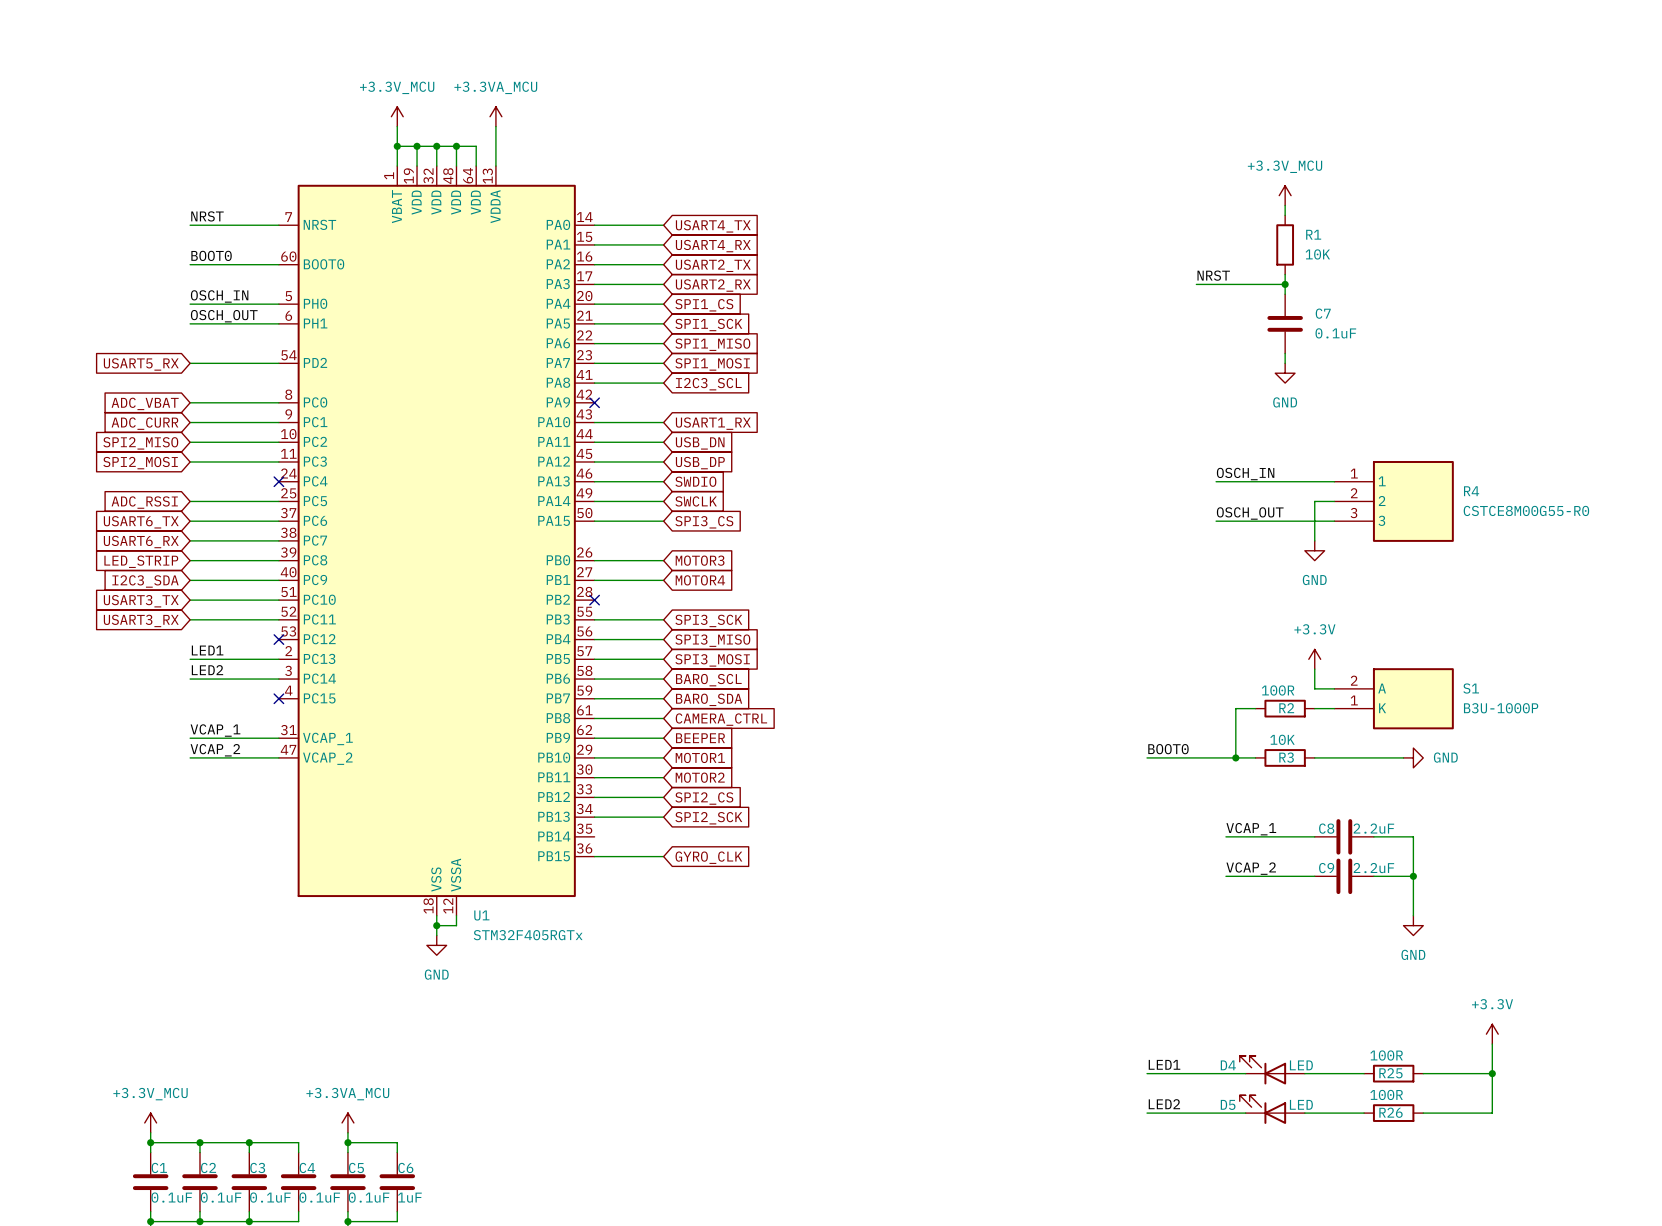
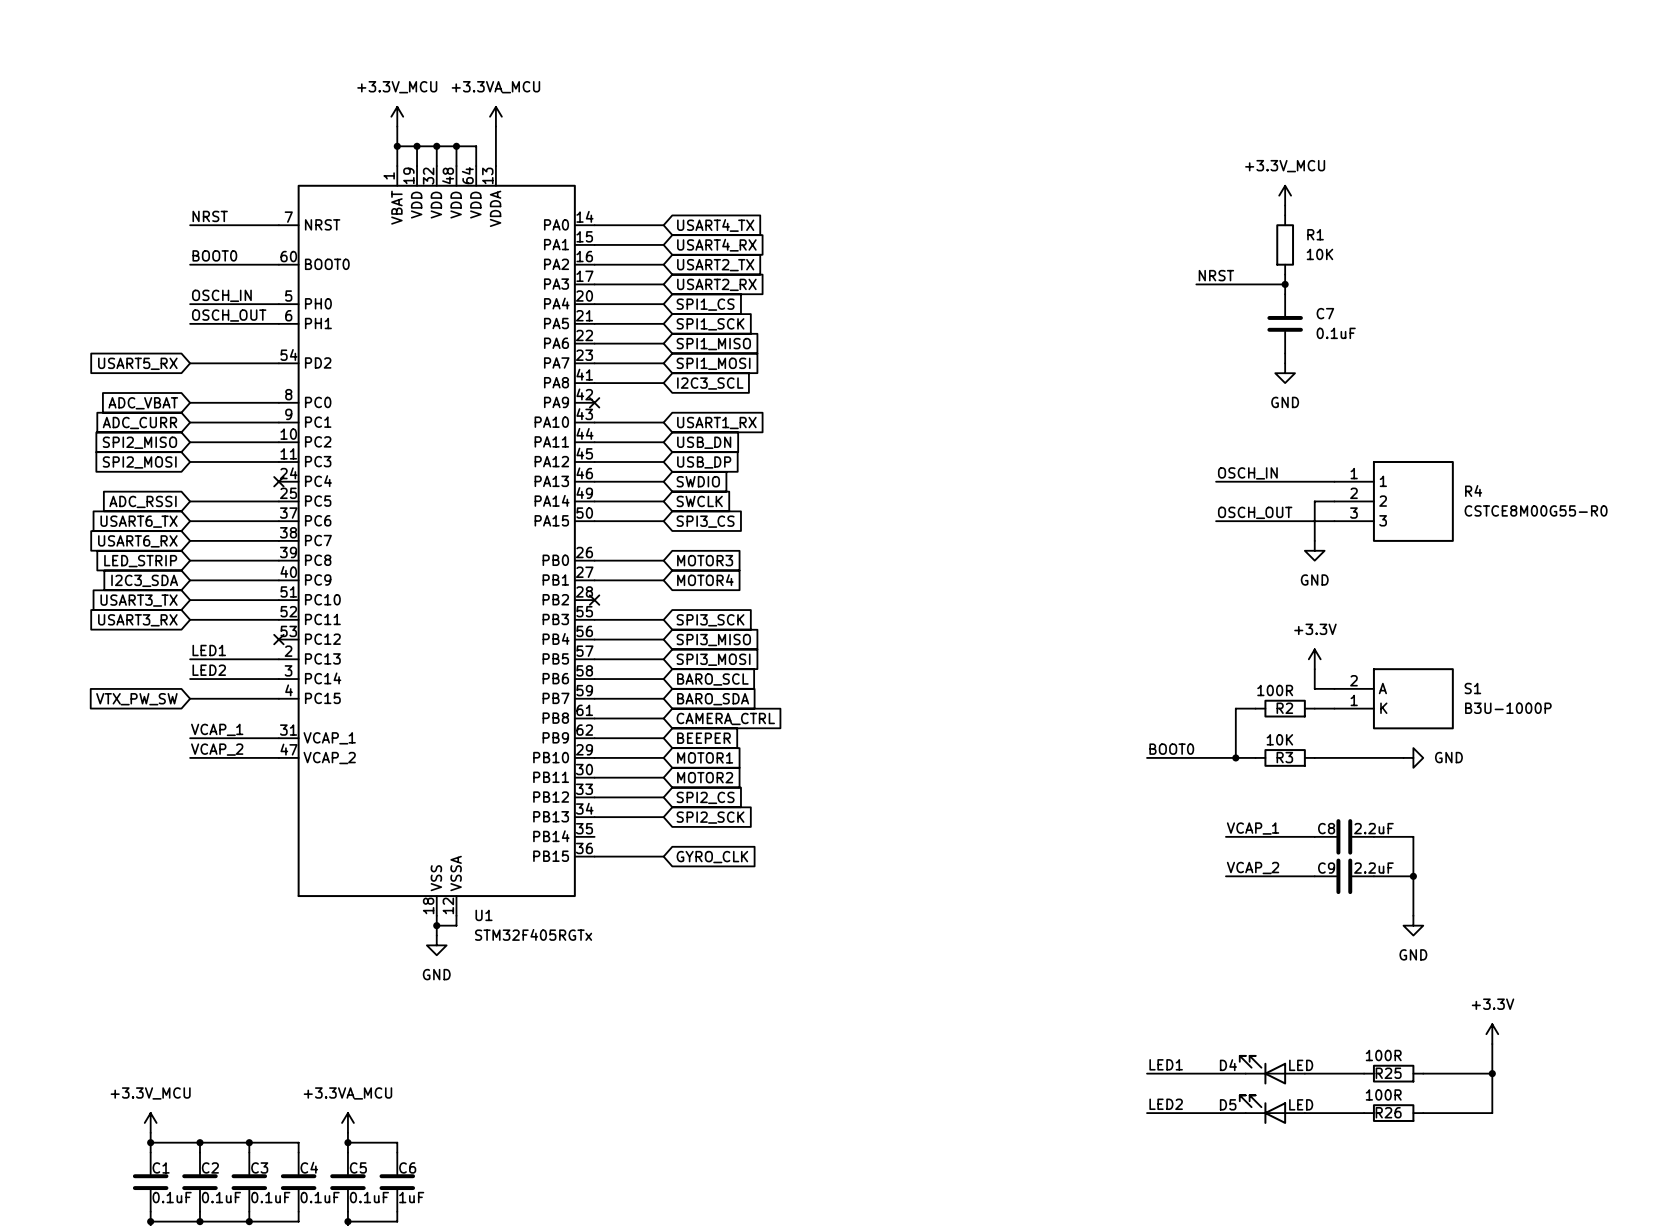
wire: none -> (190, 698) (278, 698)
no-connect mark: (278, 698) -> none
global label: none -> VTX_PW_SW (136, 699)

